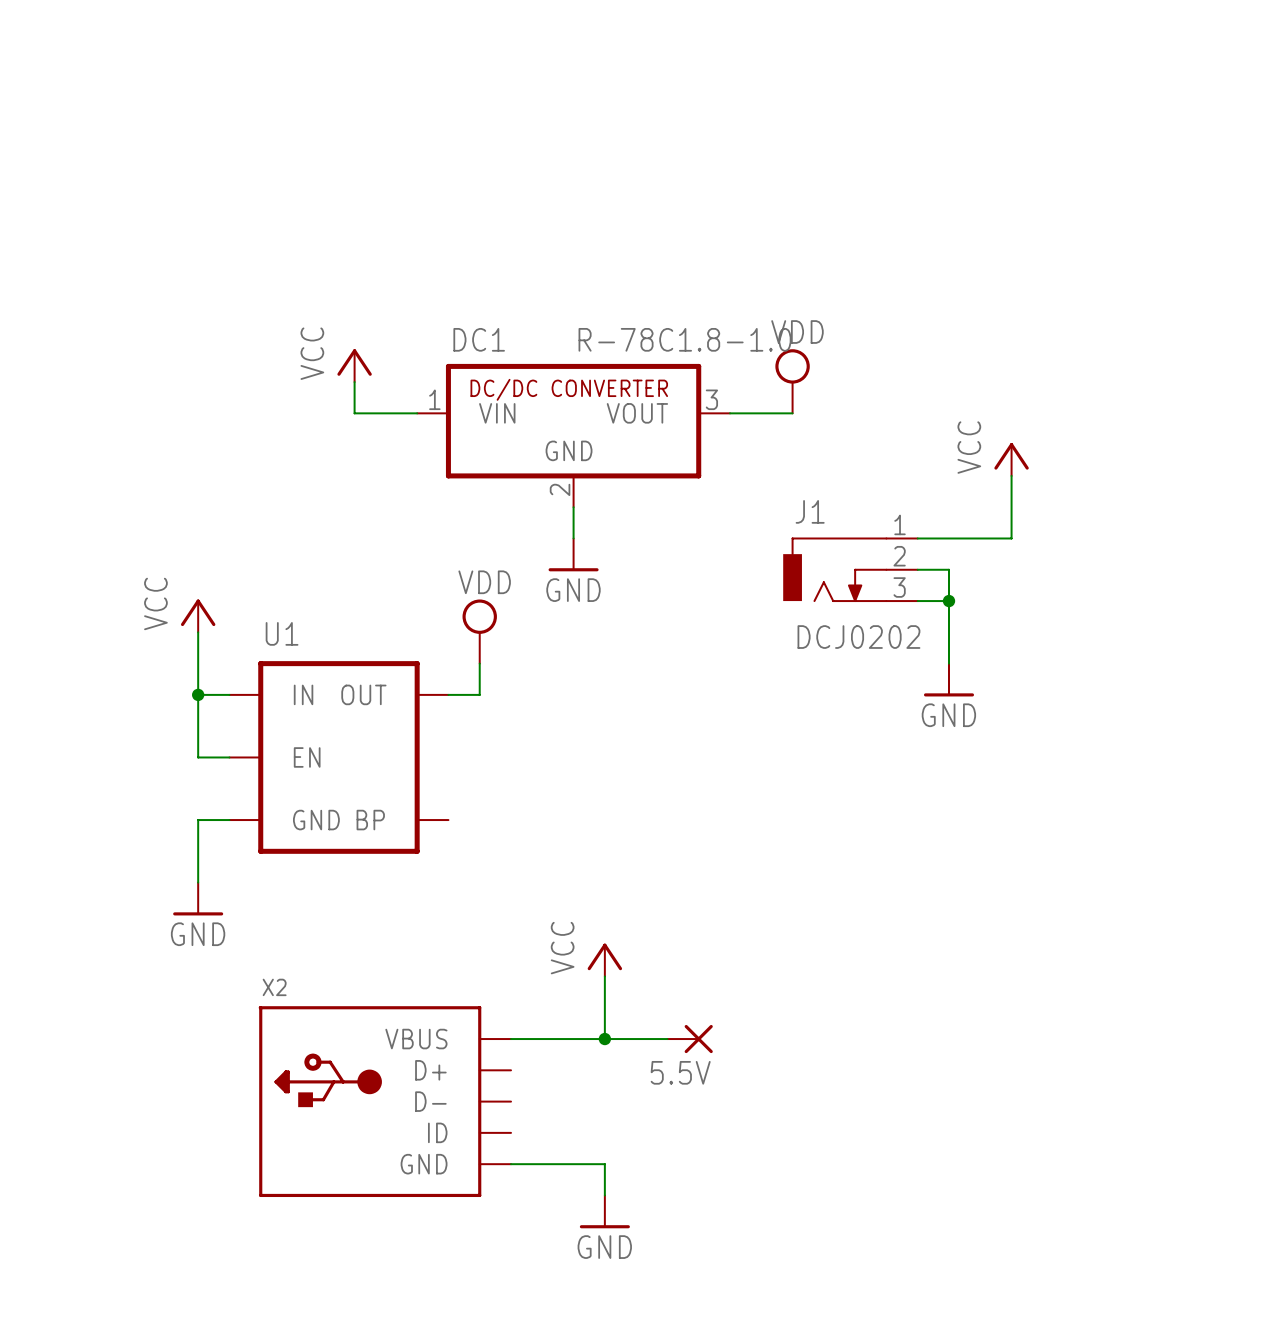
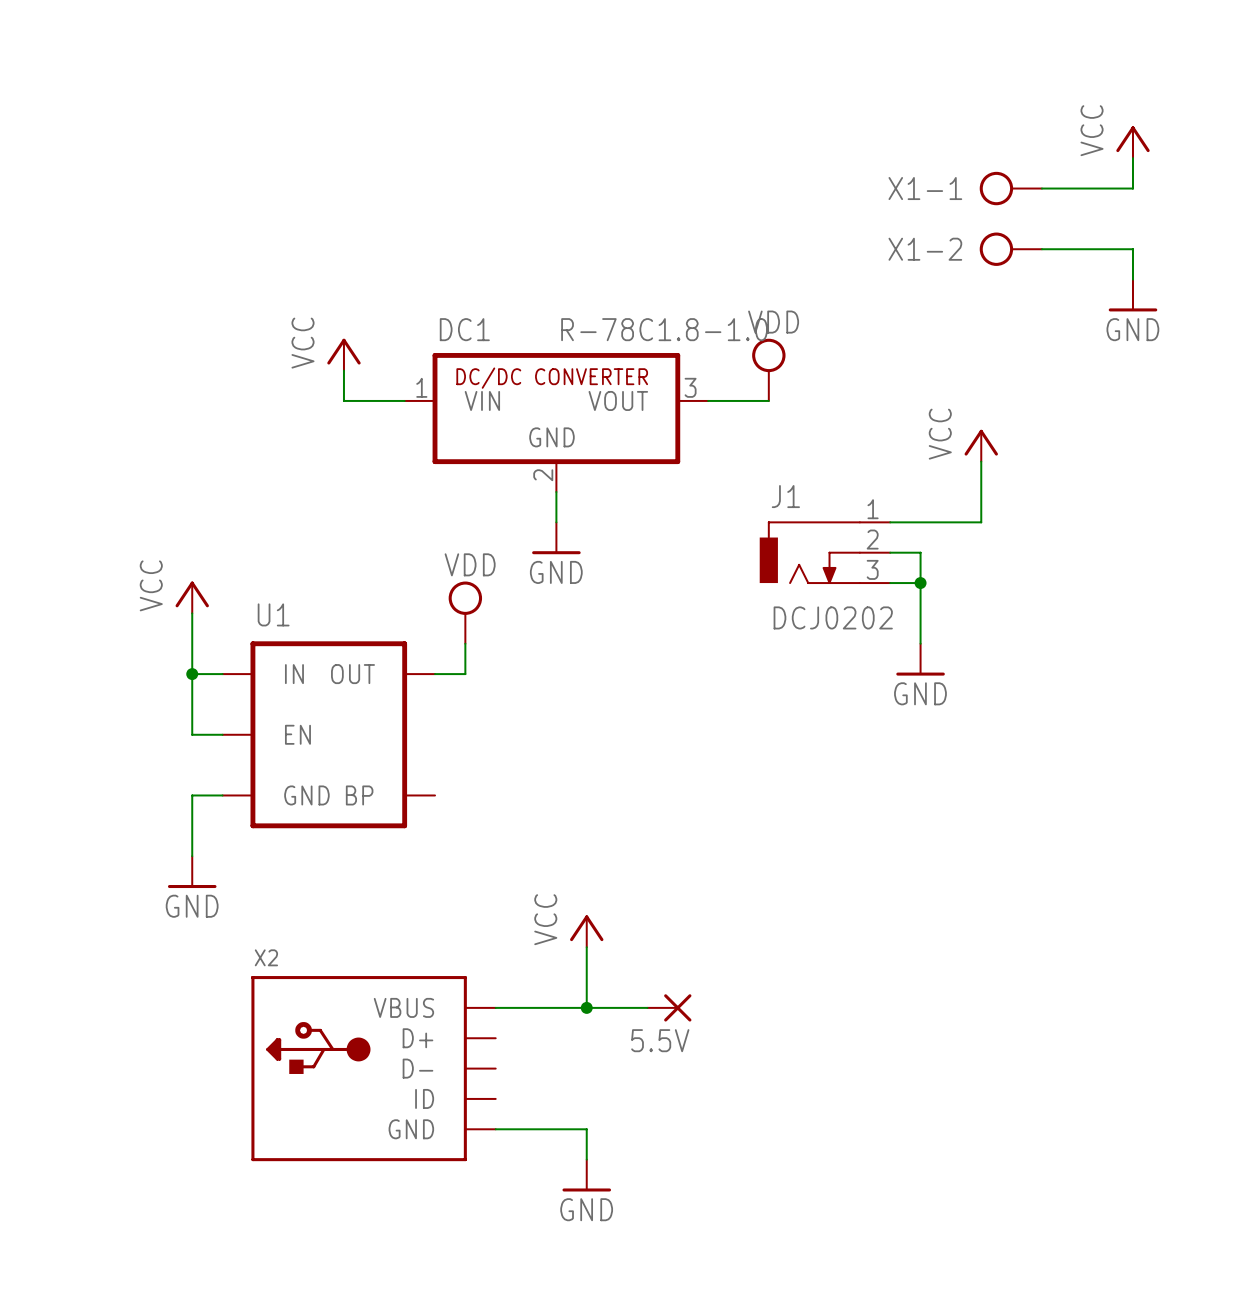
power symbol: none -> VCC (1132, 142)
wire: none -> (1132, 158) (1132, 188) (1041, 188)
X1-1: none -> (1010, 188)
X1-2: none -> (1010, 249)
wire: none -> (1041, 249) (1132, 249) (1132, 279)
power symbol: none -> GND (1132, 295)

